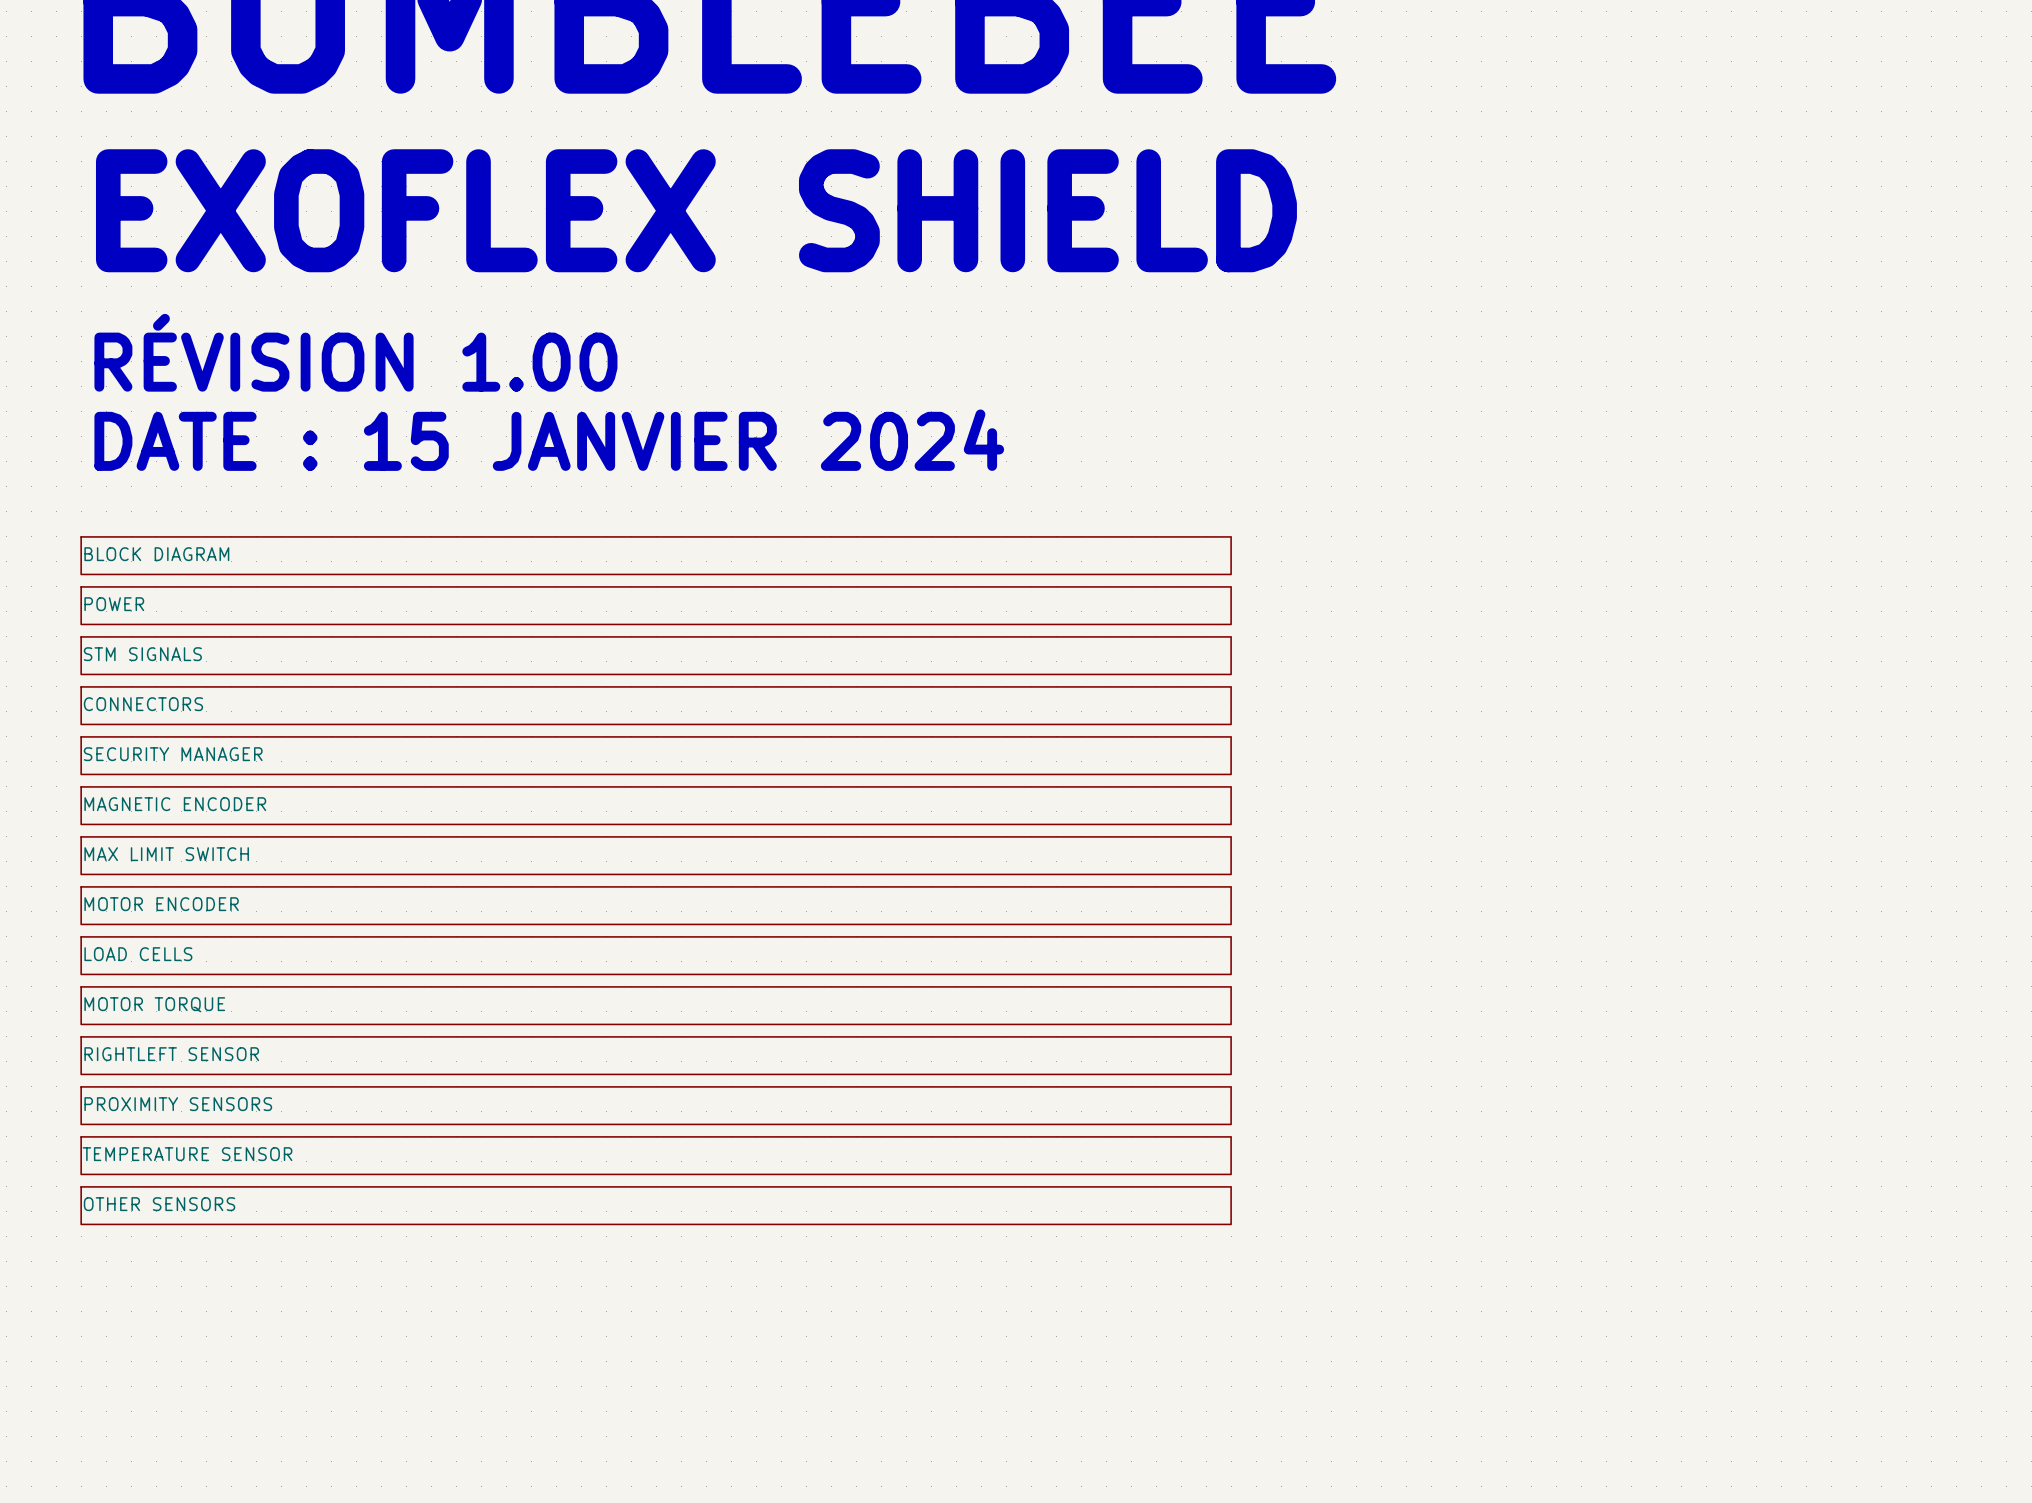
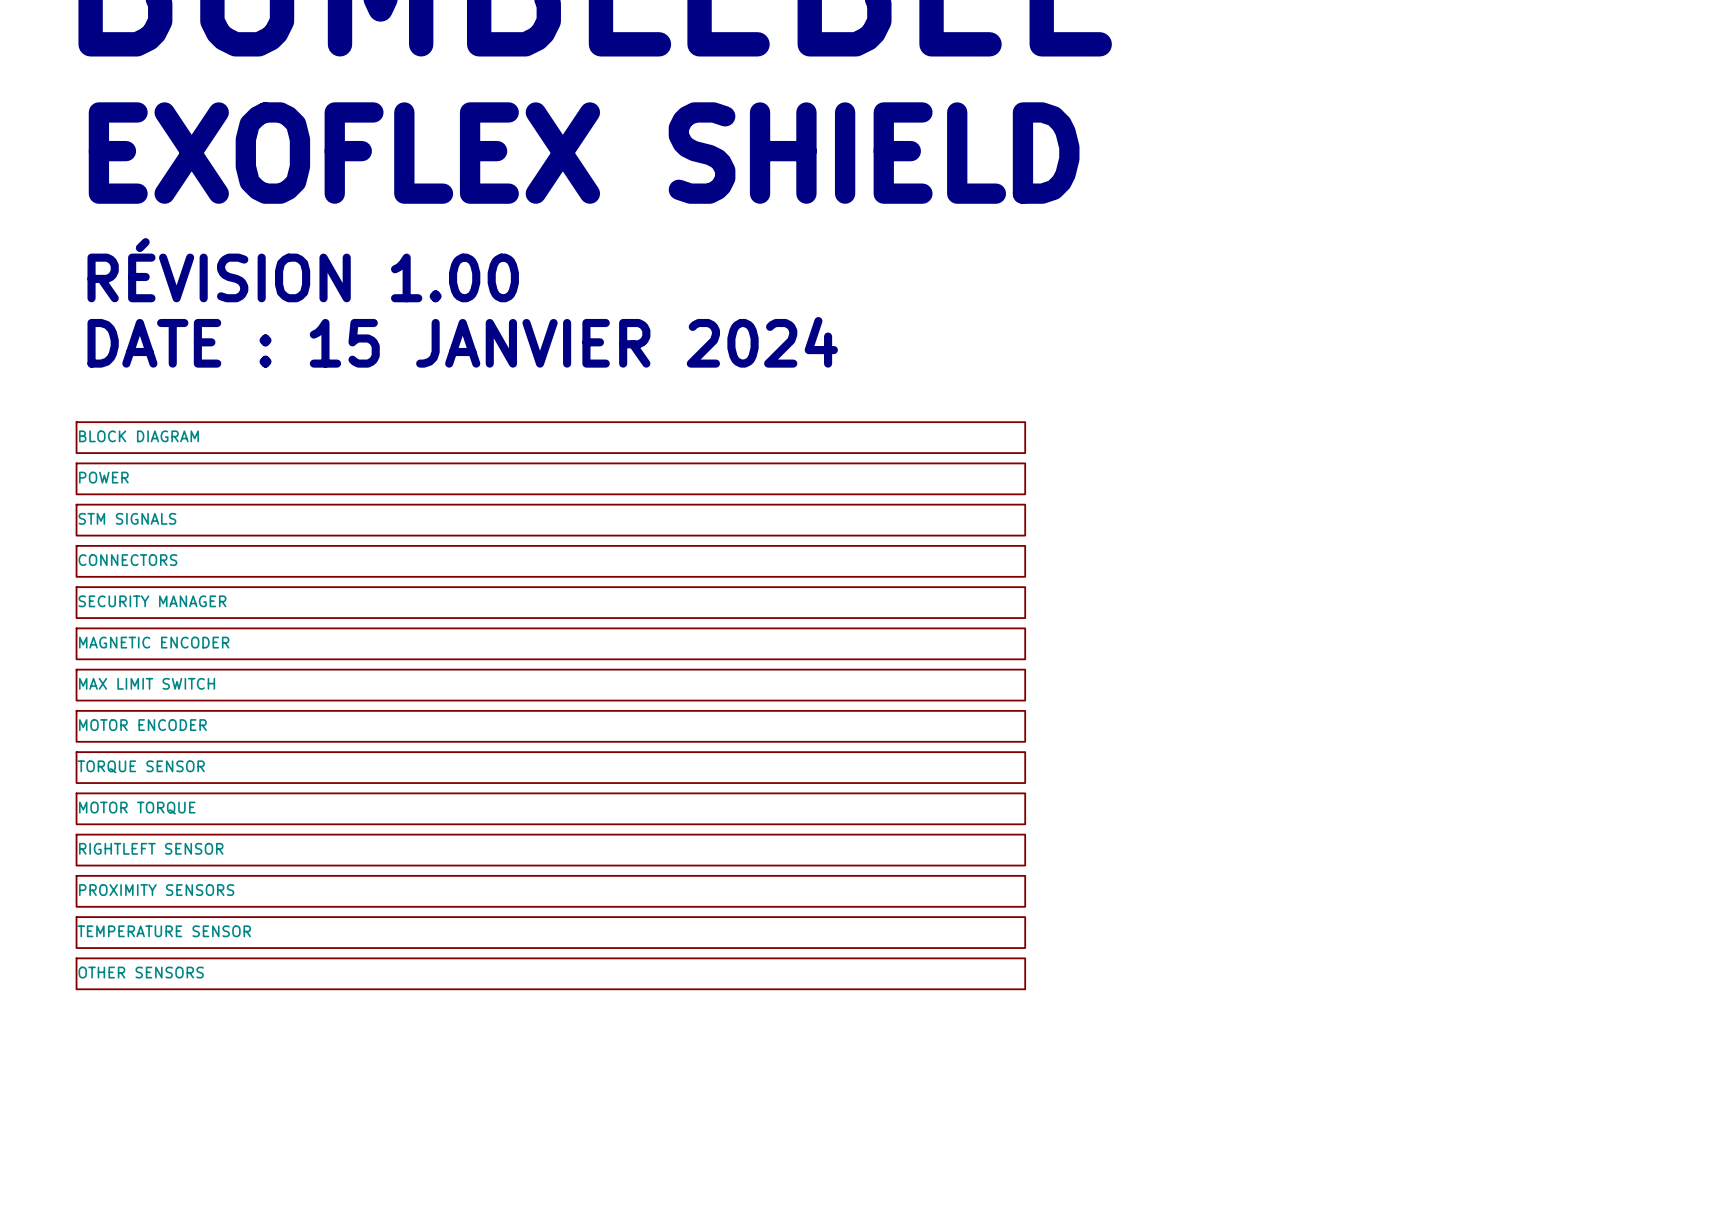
sheet LOAD CELLS name: LOAD CELLS (138, 954) -> TORQUE SENSOR (141, 766)

